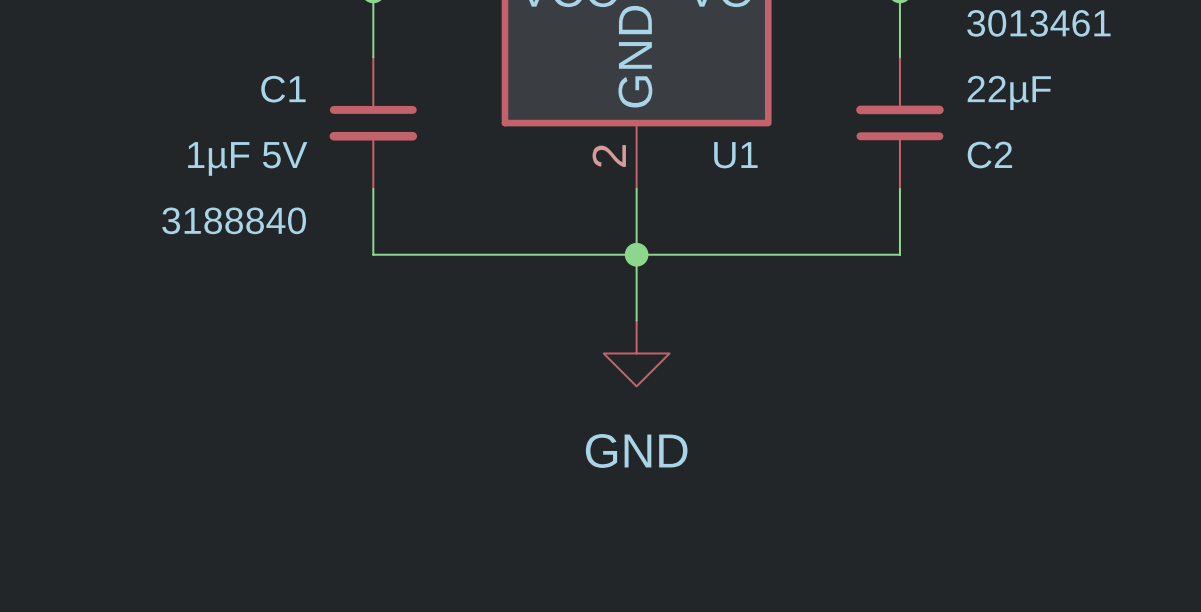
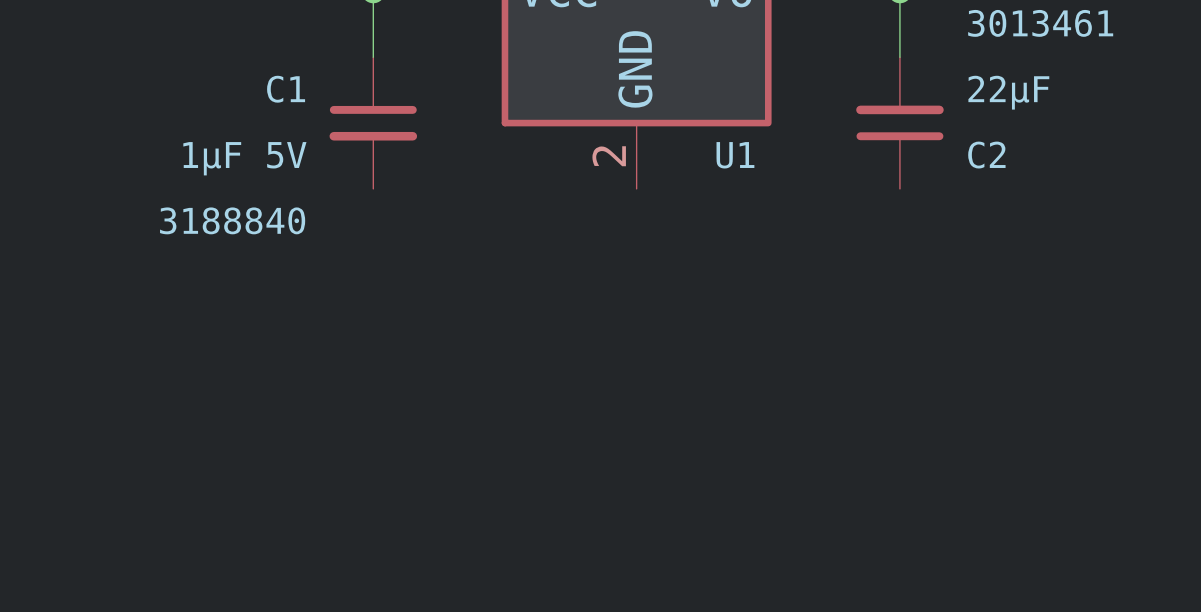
wire: (373, 188) (373, 254) (899, 254) (899, 188) -> none
wire: (636, 188) (636, 320) -> none
junction: (636, 254) -> none
power symbol: GND (636, 353) -> none

